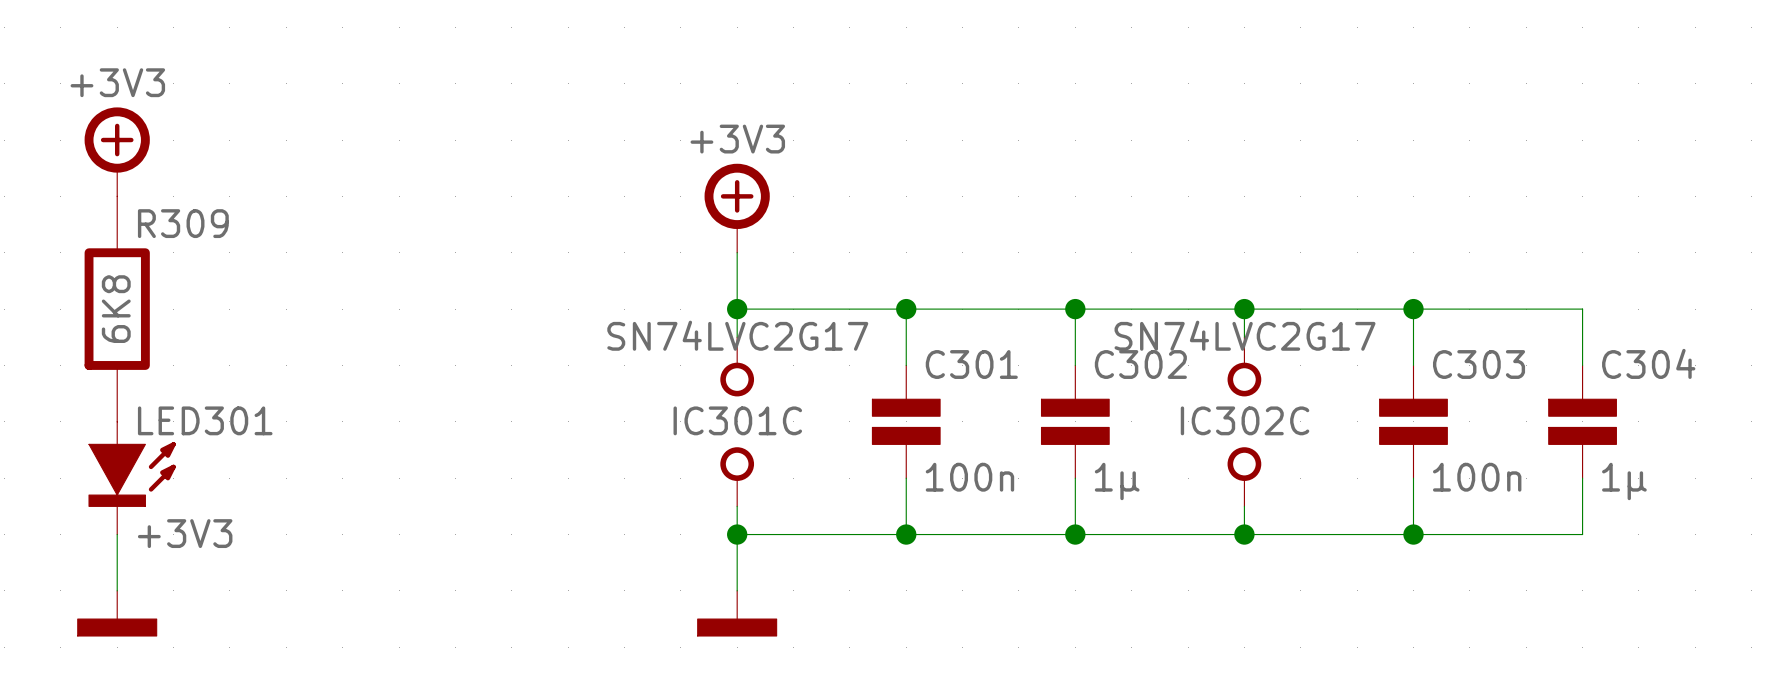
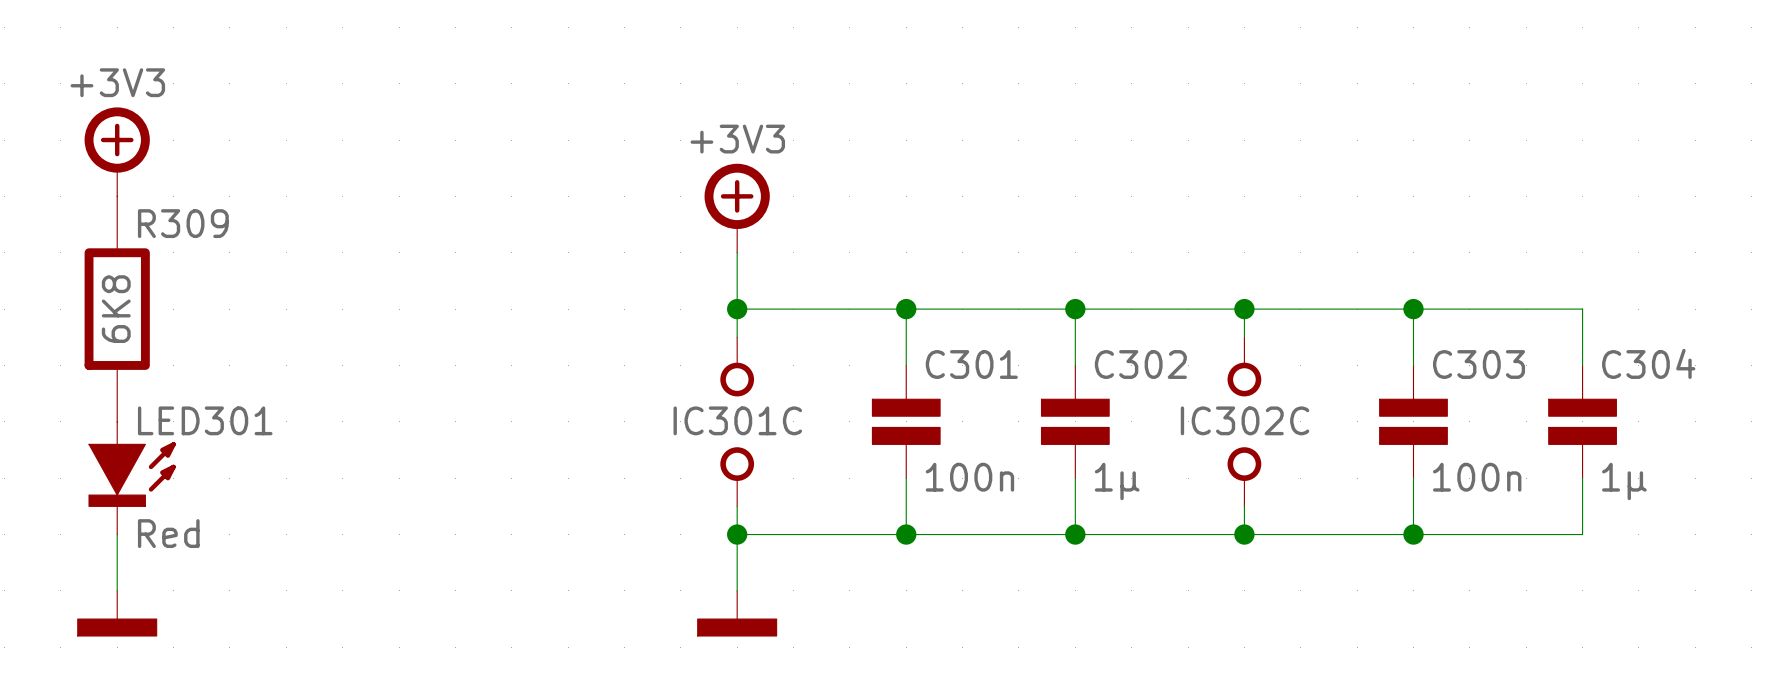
IC301C text: SN74LVC2G17 (737, 335) -> none
IC302C text: SN74LVC2G17 (1245, 335) -> none
LED301 text: none -> Red (168, 533)
LED301 value: +3V3 (185, 533) -> none

